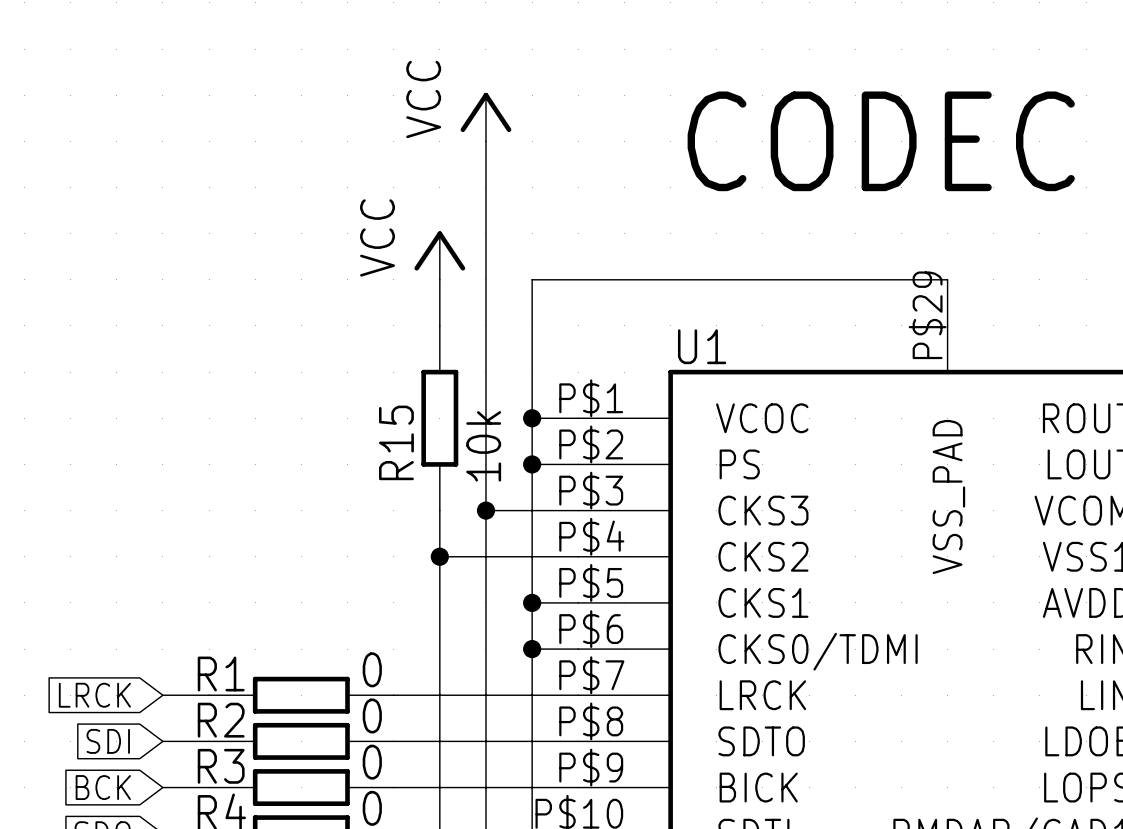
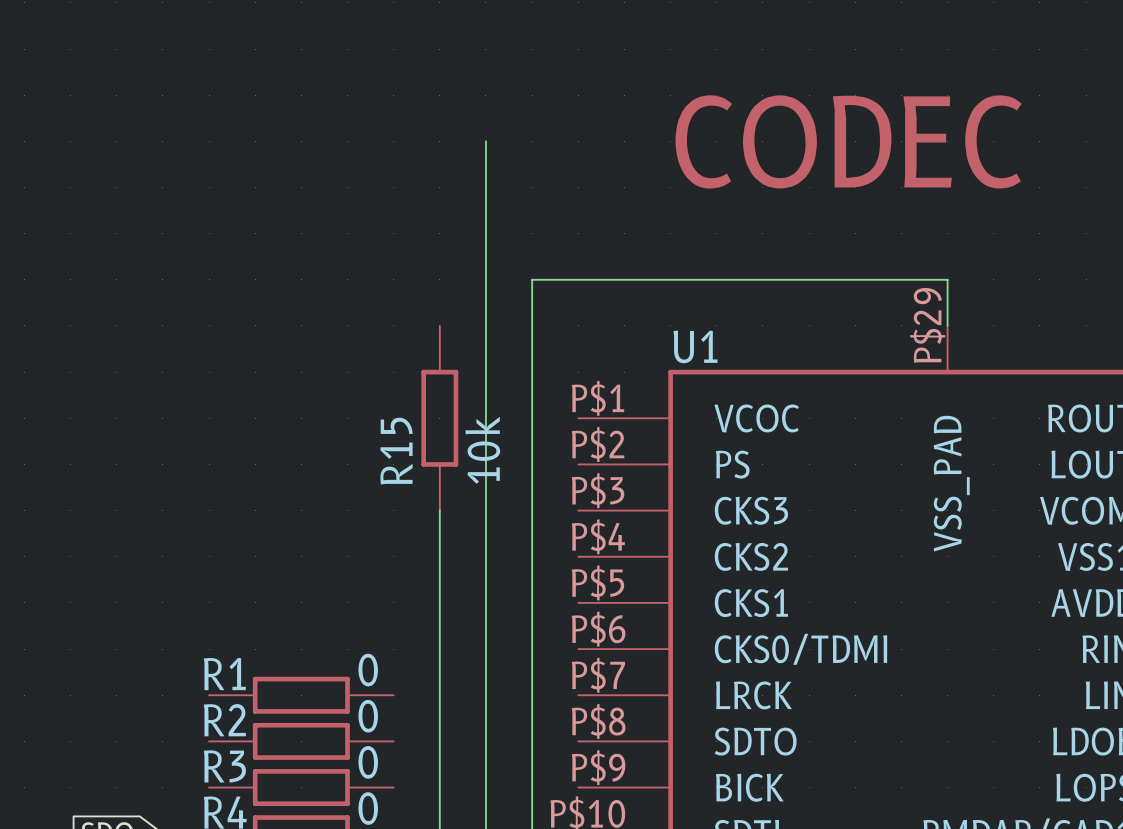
power symbol: VCC (485, 117) -> none
power symbol: VCC (439, 255) -> none
wire: (439, 279) (439, 325) -> none
wire: (532, 418) (578, 418) -> none
junction: (532, 418) -> none
wire: (532, 464) (578, 464) -> none
junction: (532, 464) -> none
wire: (485, 510) (578, 510) -> none
junction: (485, 510) -> none
wire: (439, 556) (578, 556) -> none
junction: (439, 556) -> none
wire: (532, 602) (578, 602) -> none
junction: (532, 602) -> none
wire: (532, 649) (578, 649) -> none
junction: (532, 649) -> none
global label: LRCK (94, 695) -> none
wire: (162, 695) (209, 695) -> none
wire: (393, 695) (578, 695) -> none
global label: SDI (108, 741) -> none
wire: (162, 741) (209, 741) -> none
wire: (393, 741) (578, 741) -> none
global label: BCK (103, 787) -> none
wire: (162, 787) (209, 787) -> none
wire: (393, 787) (578, 787) -> none

